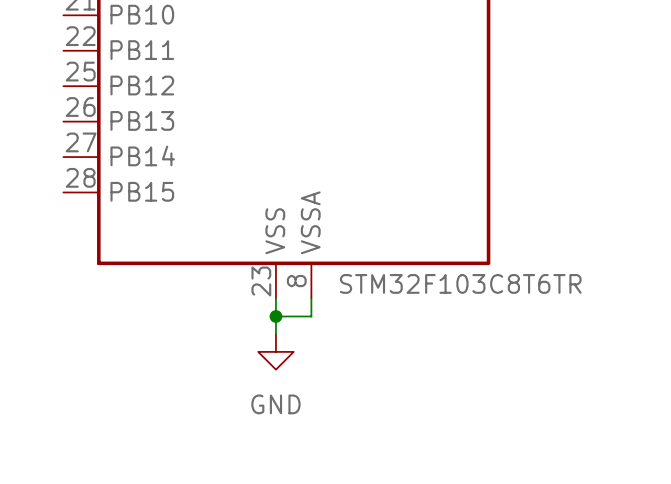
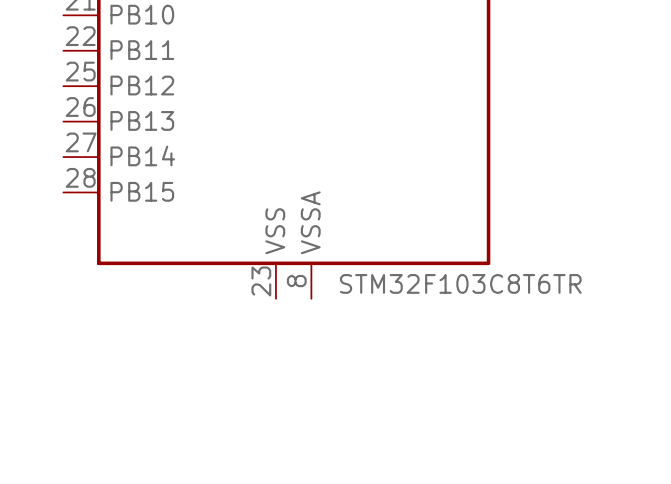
wire: (275, 298) (275, 334) -> none
wire: (311, 298) (311, 316) (275, 316) -> none
junction: (275, 316) -> none
power symbol: GND (275, 351) -> none

